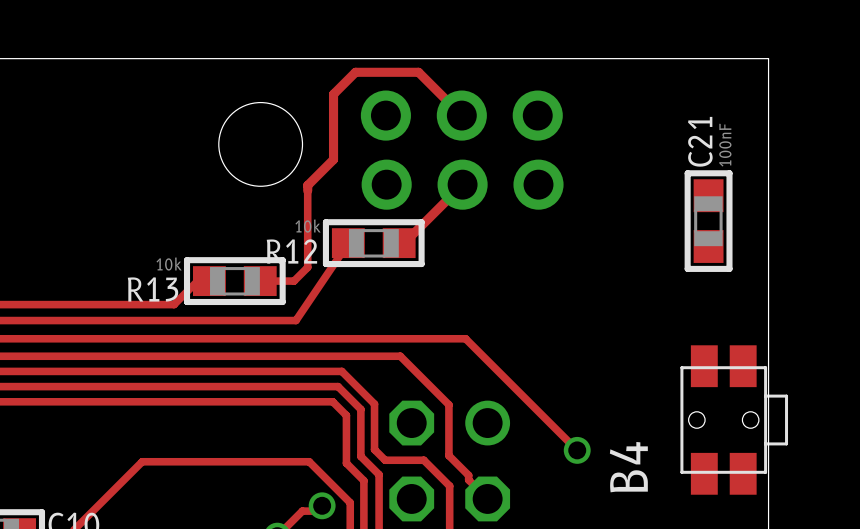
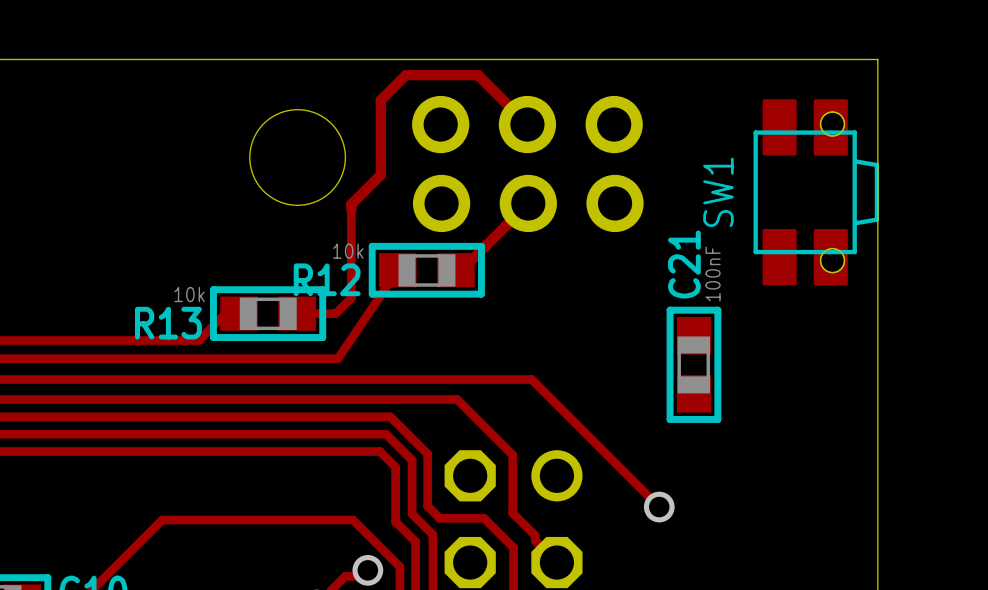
SW1: none -> (816, 192)
C21 position: (708, 221) -> (693, 364)
B4: (734, 420) -> none

